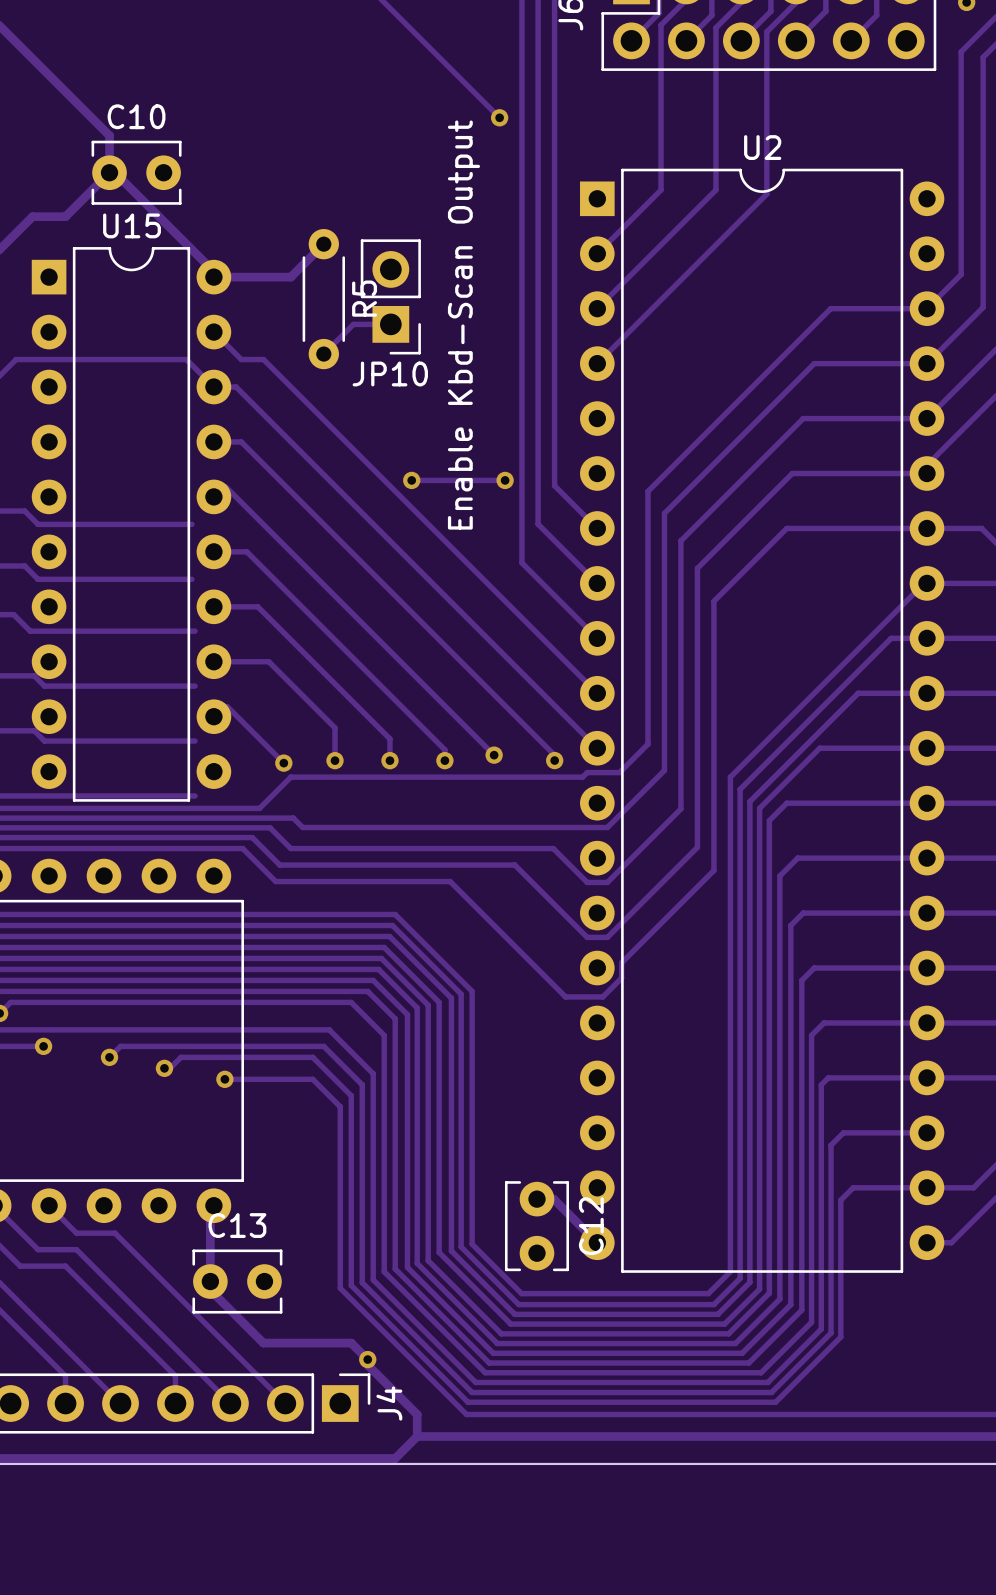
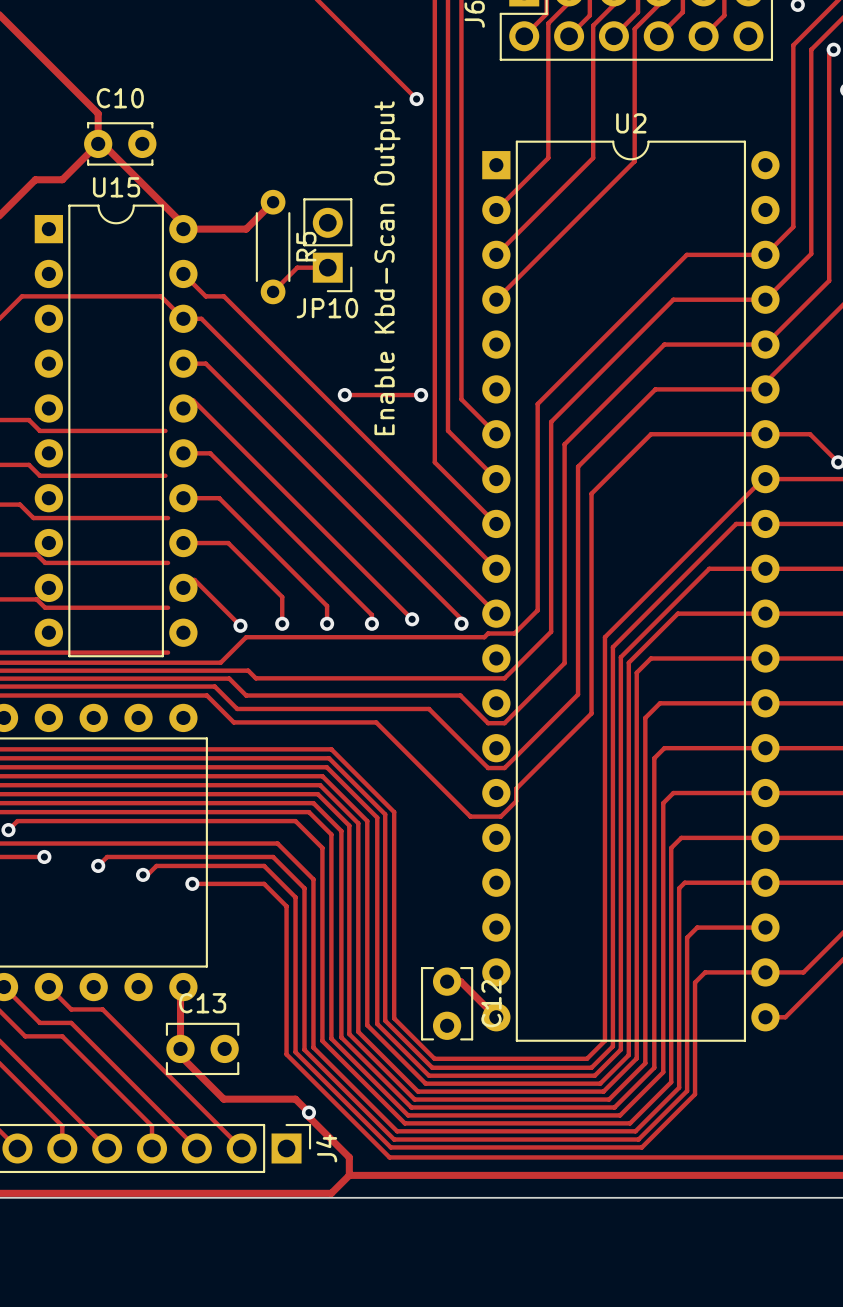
C10 footprint: [91, 140, 182, 205] -> [84, 122, 157, 166]

